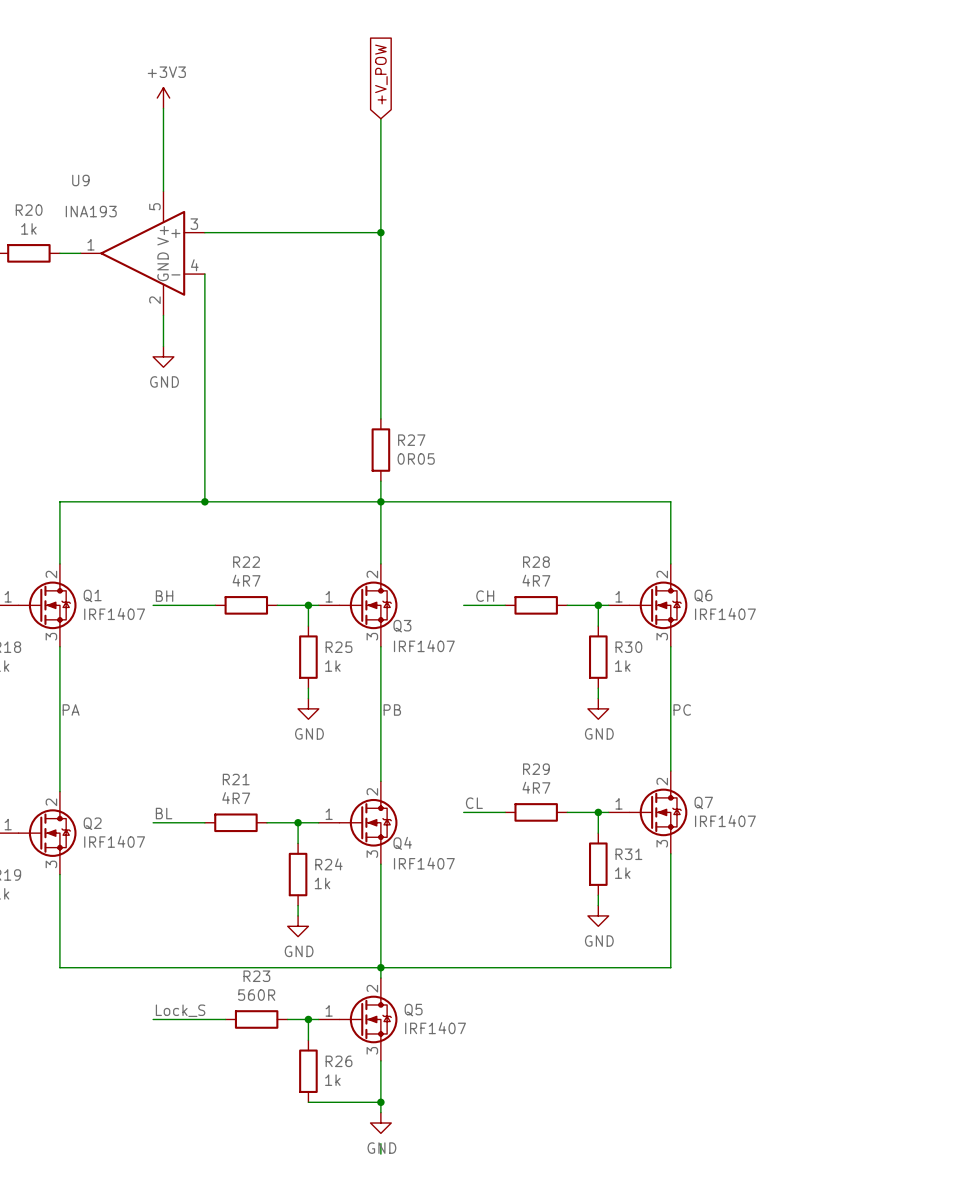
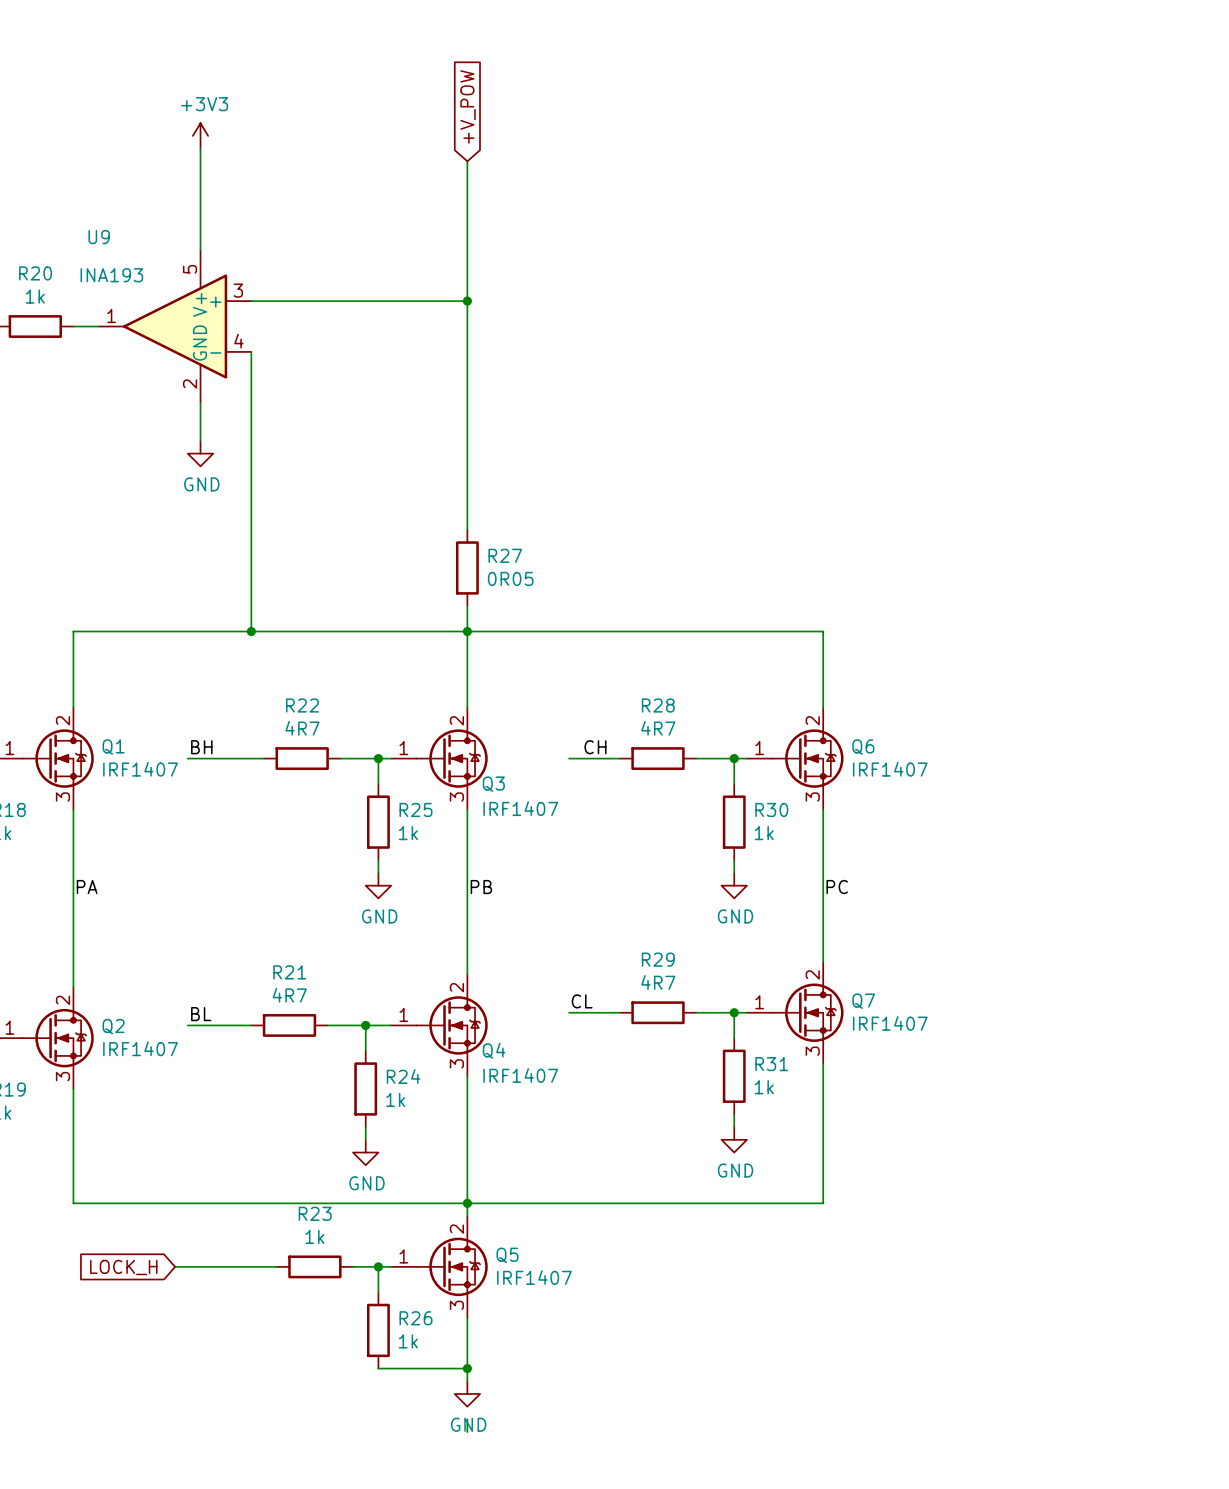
R23 value: 560R (256, 995) -> 1k (314, 1236)
label: Lock_S (180, 1010) -> none
global label: none -> LOCK_H (123, 1267)
wire: none -> (175, 1266) (187, 1266)

